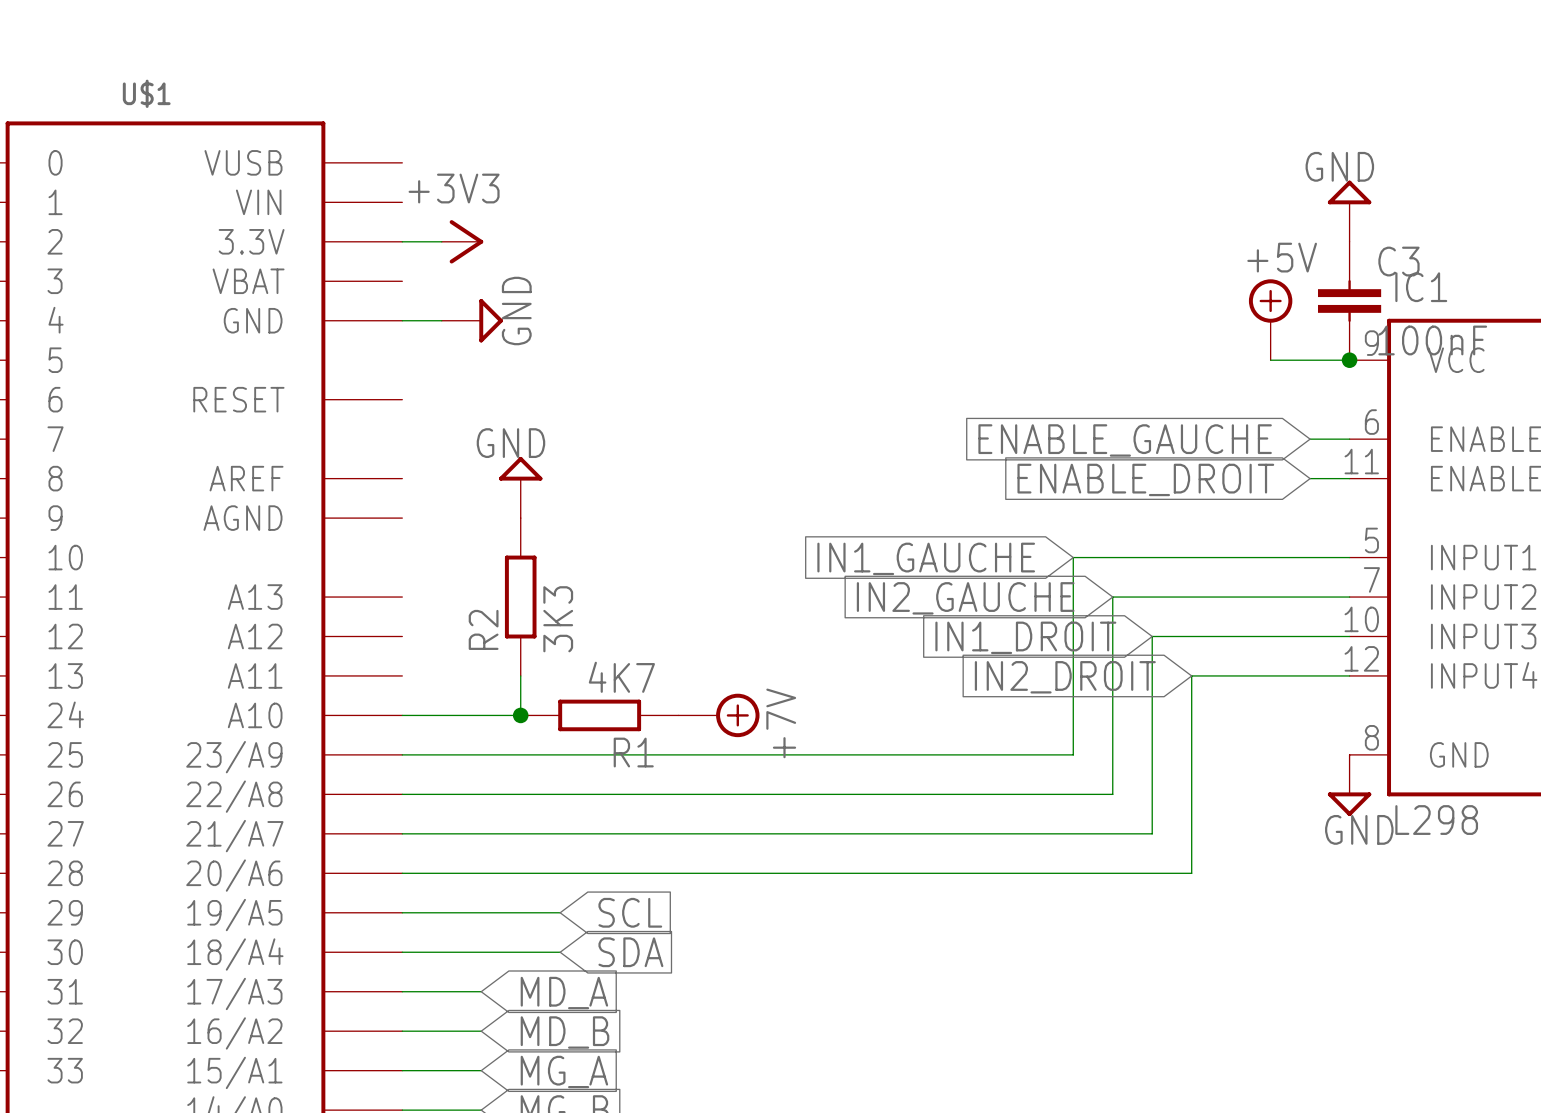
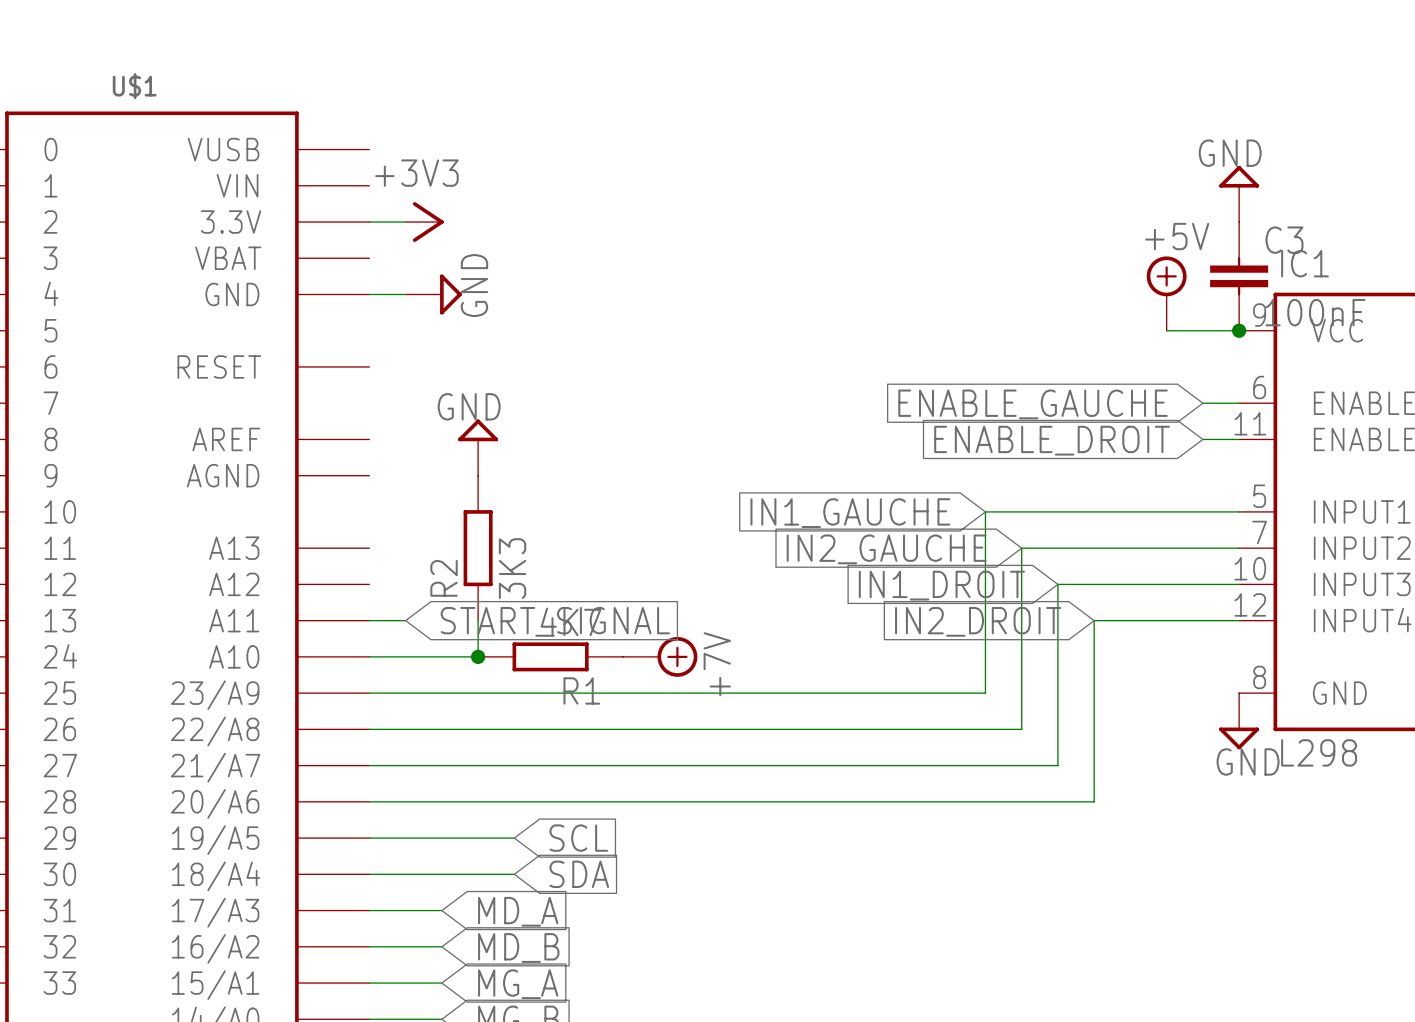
wire: none -> (369, 620) (405, 620)
global label: none -> START_SIGNAL (555, 621)

